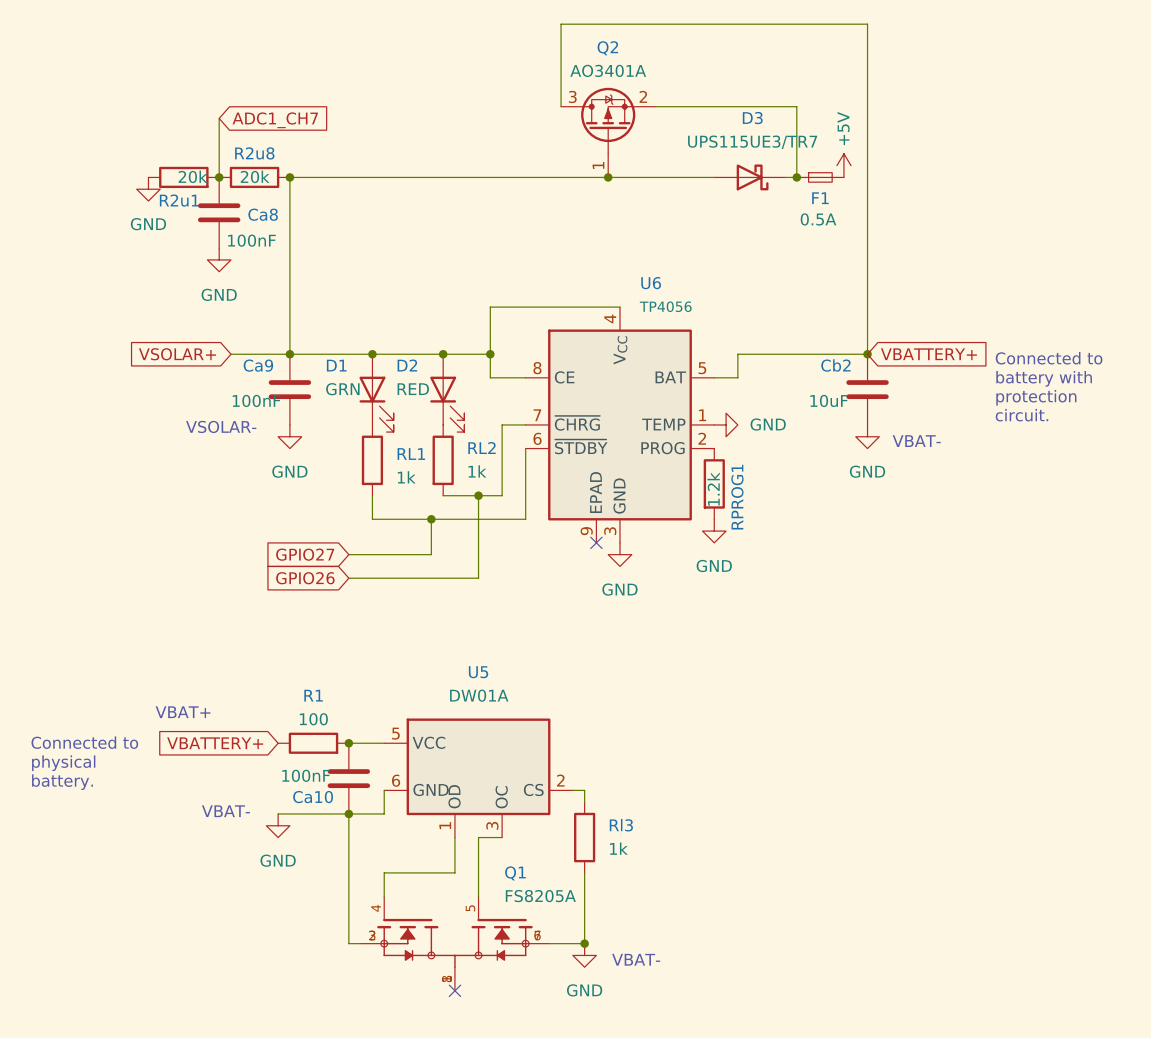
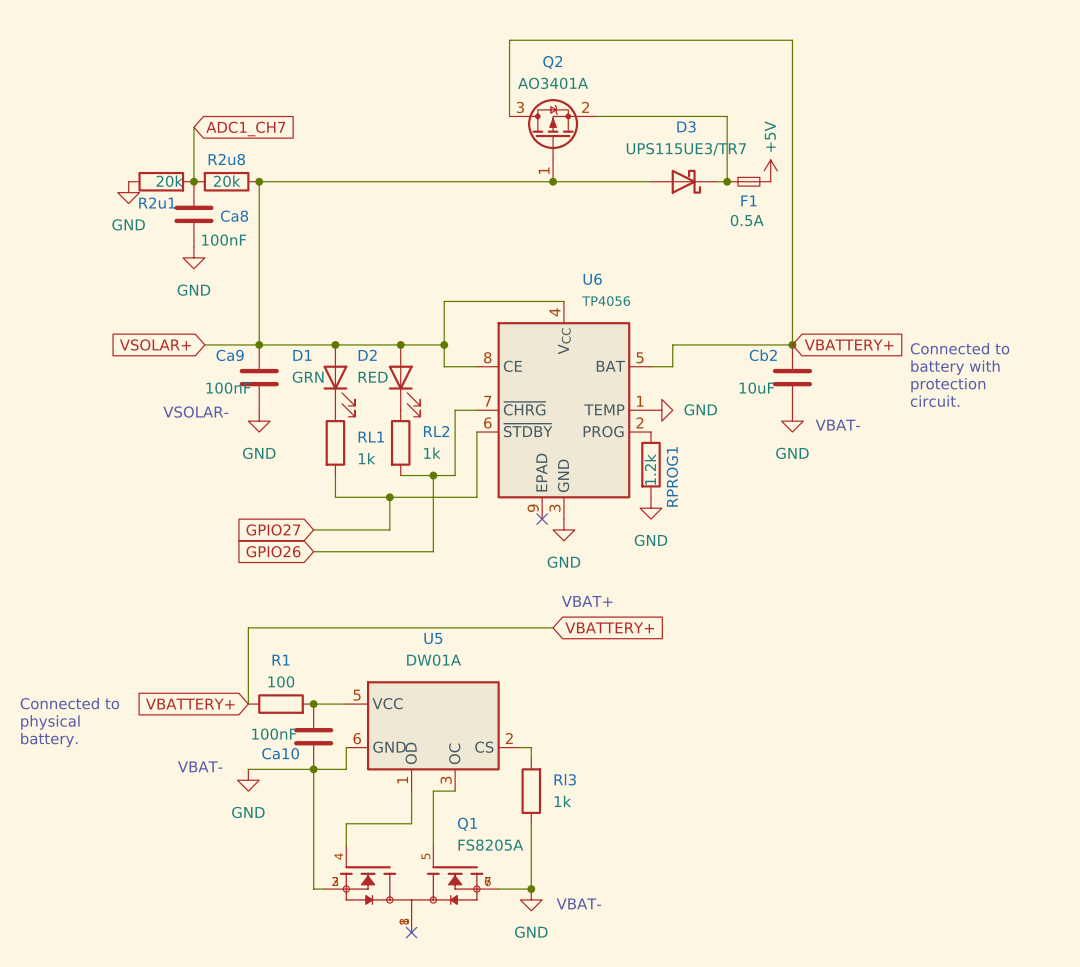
text: none -> VBAT+ (587, 601)
wire: none -> (553, 627) (248, 627) (248, 704)
global label: none -> VBATTERY+ (609, 627)
text: VBAT+ (183, 712) -> none

